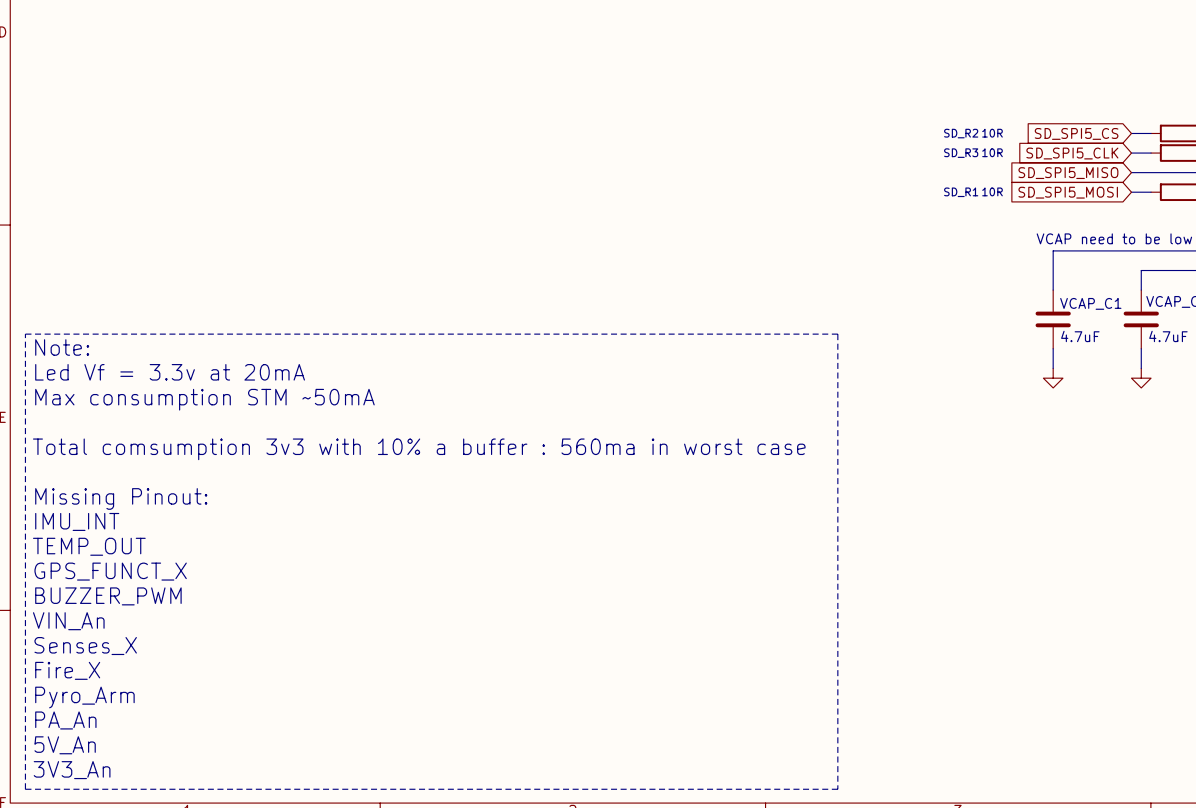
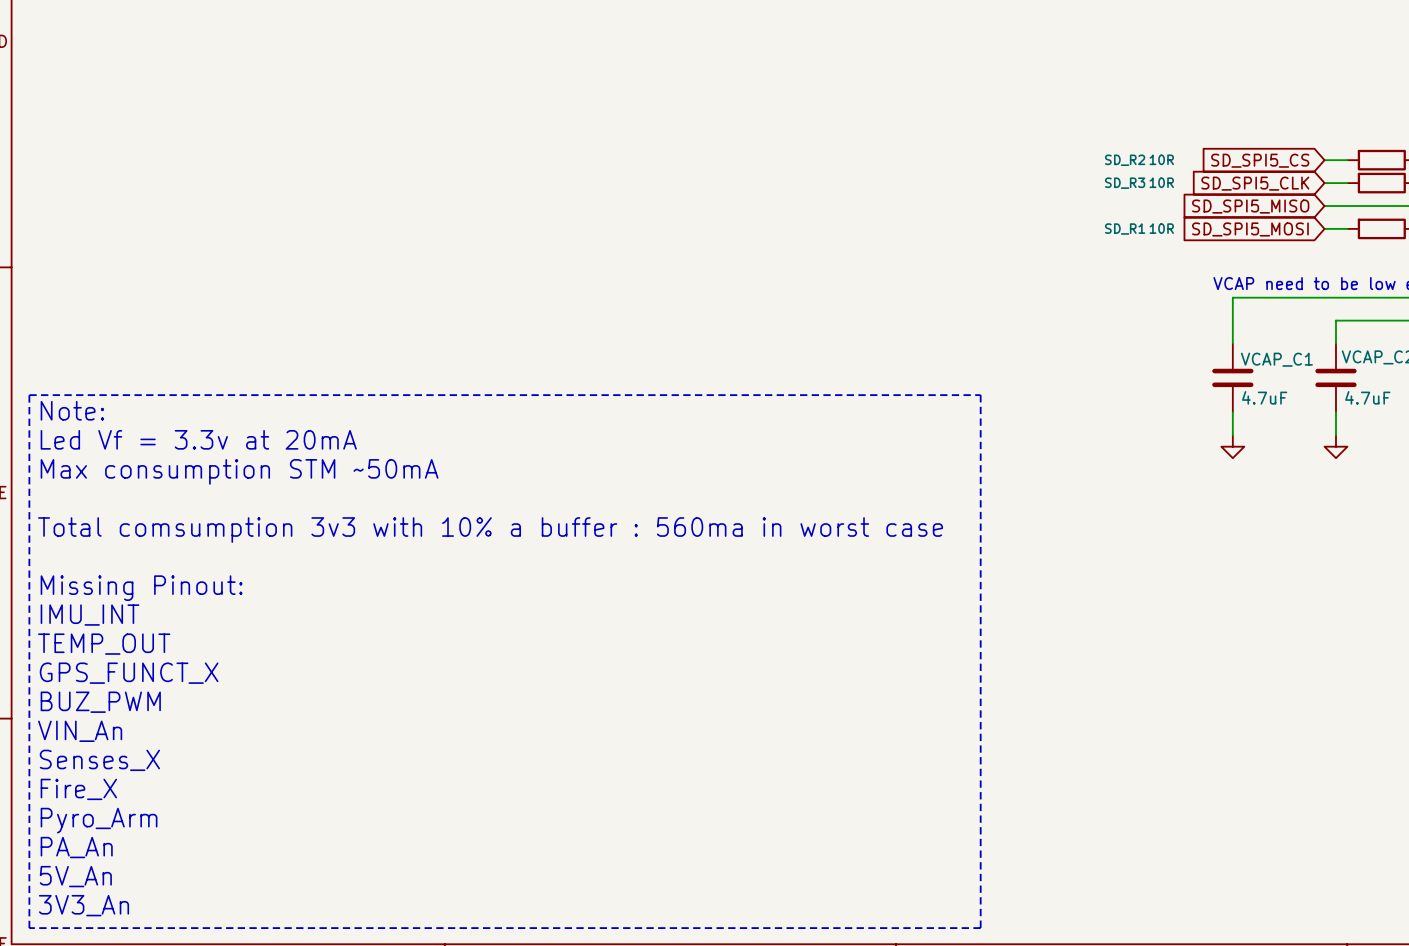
text: BUZZER_PWM (108, 596) -> BUZ_PWM (100, 702)

